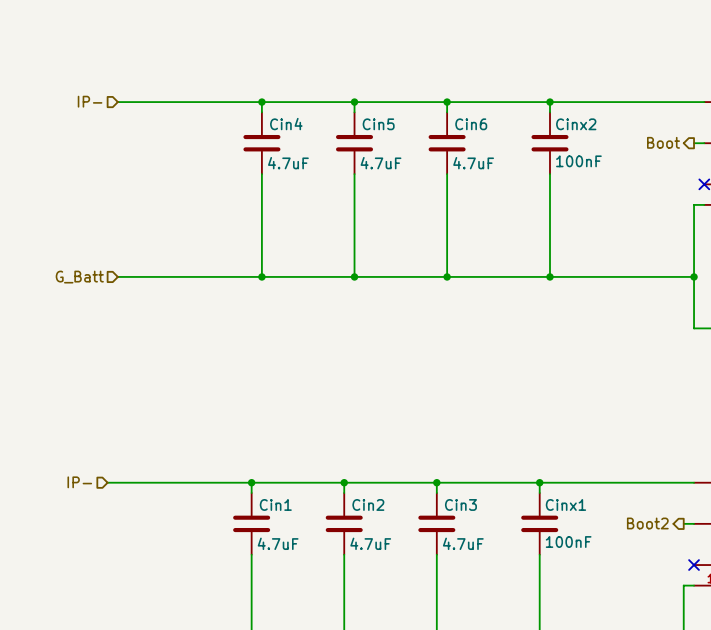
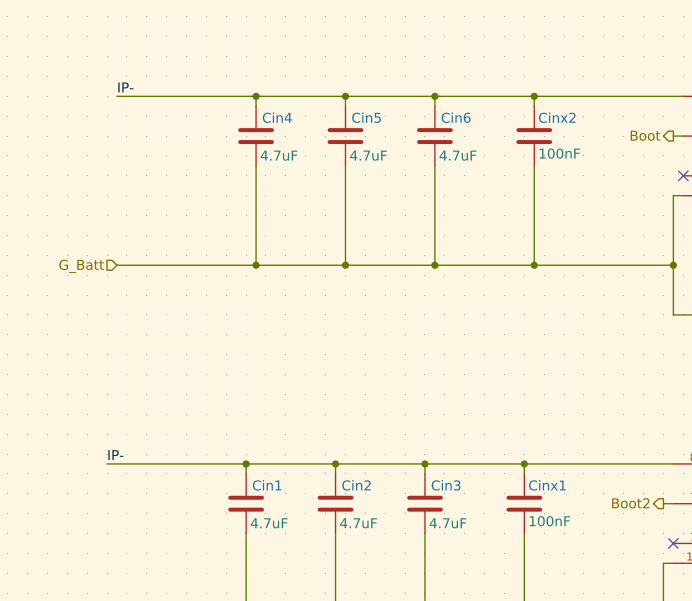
label: none -> IP- (125, 87)
hierarchical label: IP- (90, 101) -> none
label: none -> IP- (115, 455)
hierarchical label: IP- (79, 482) -> none

